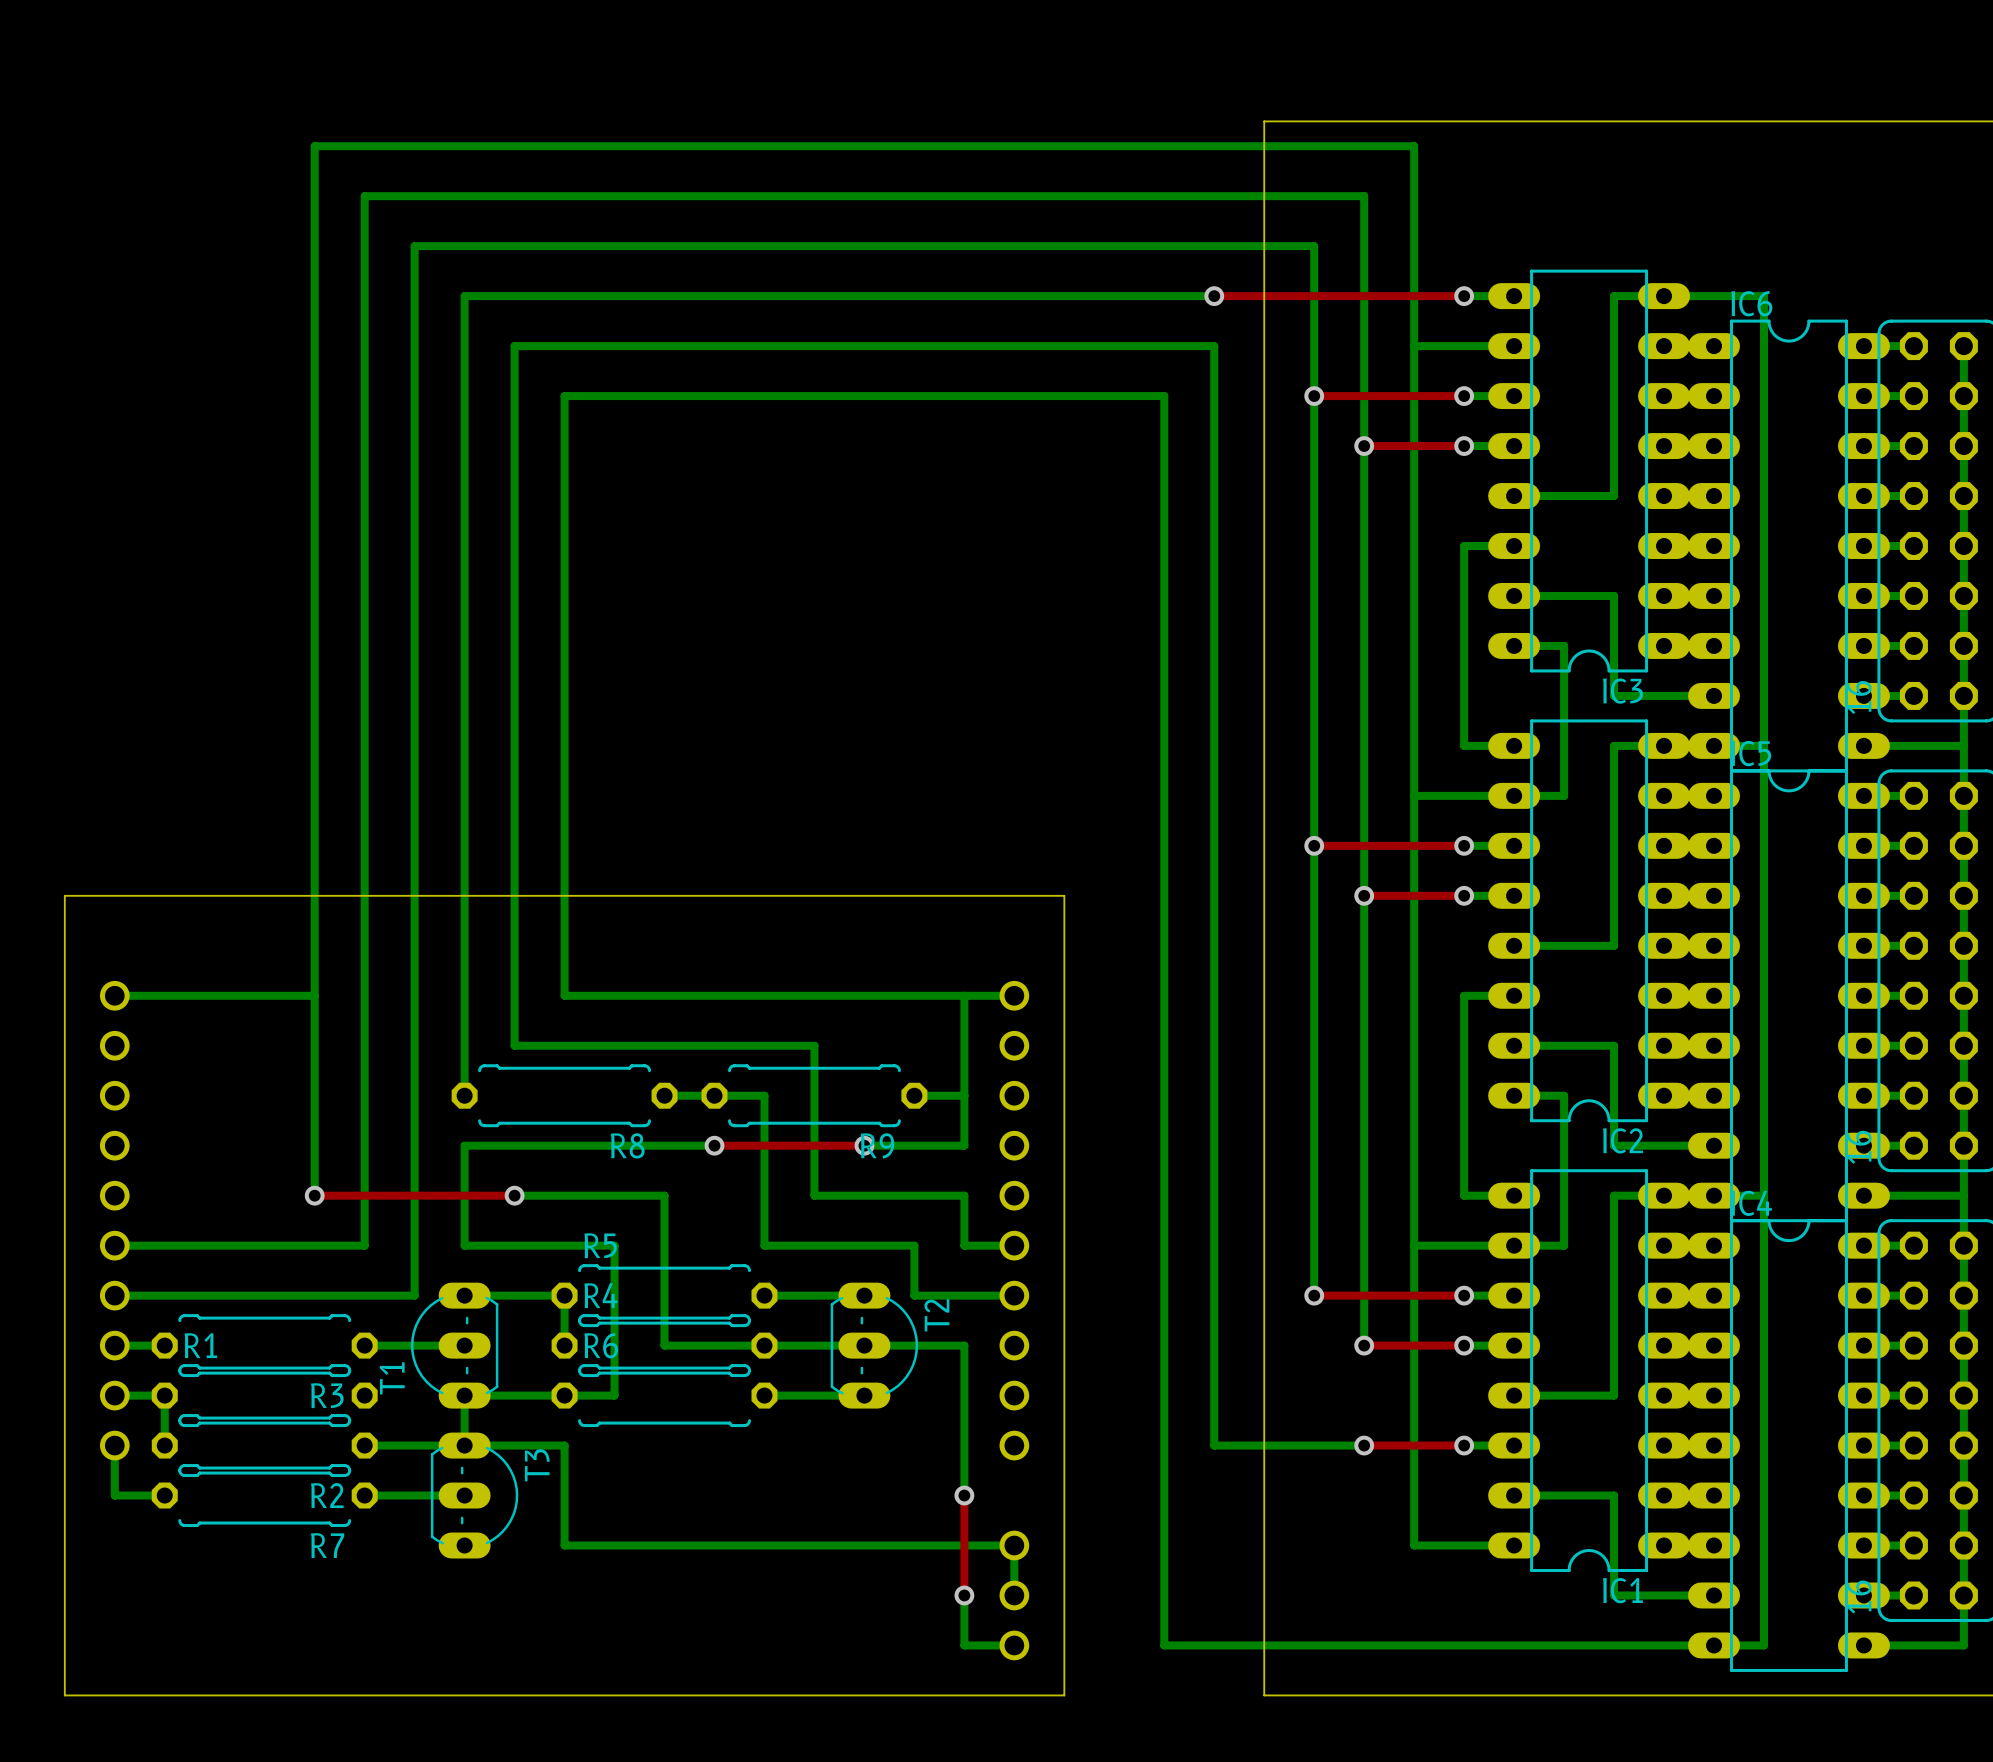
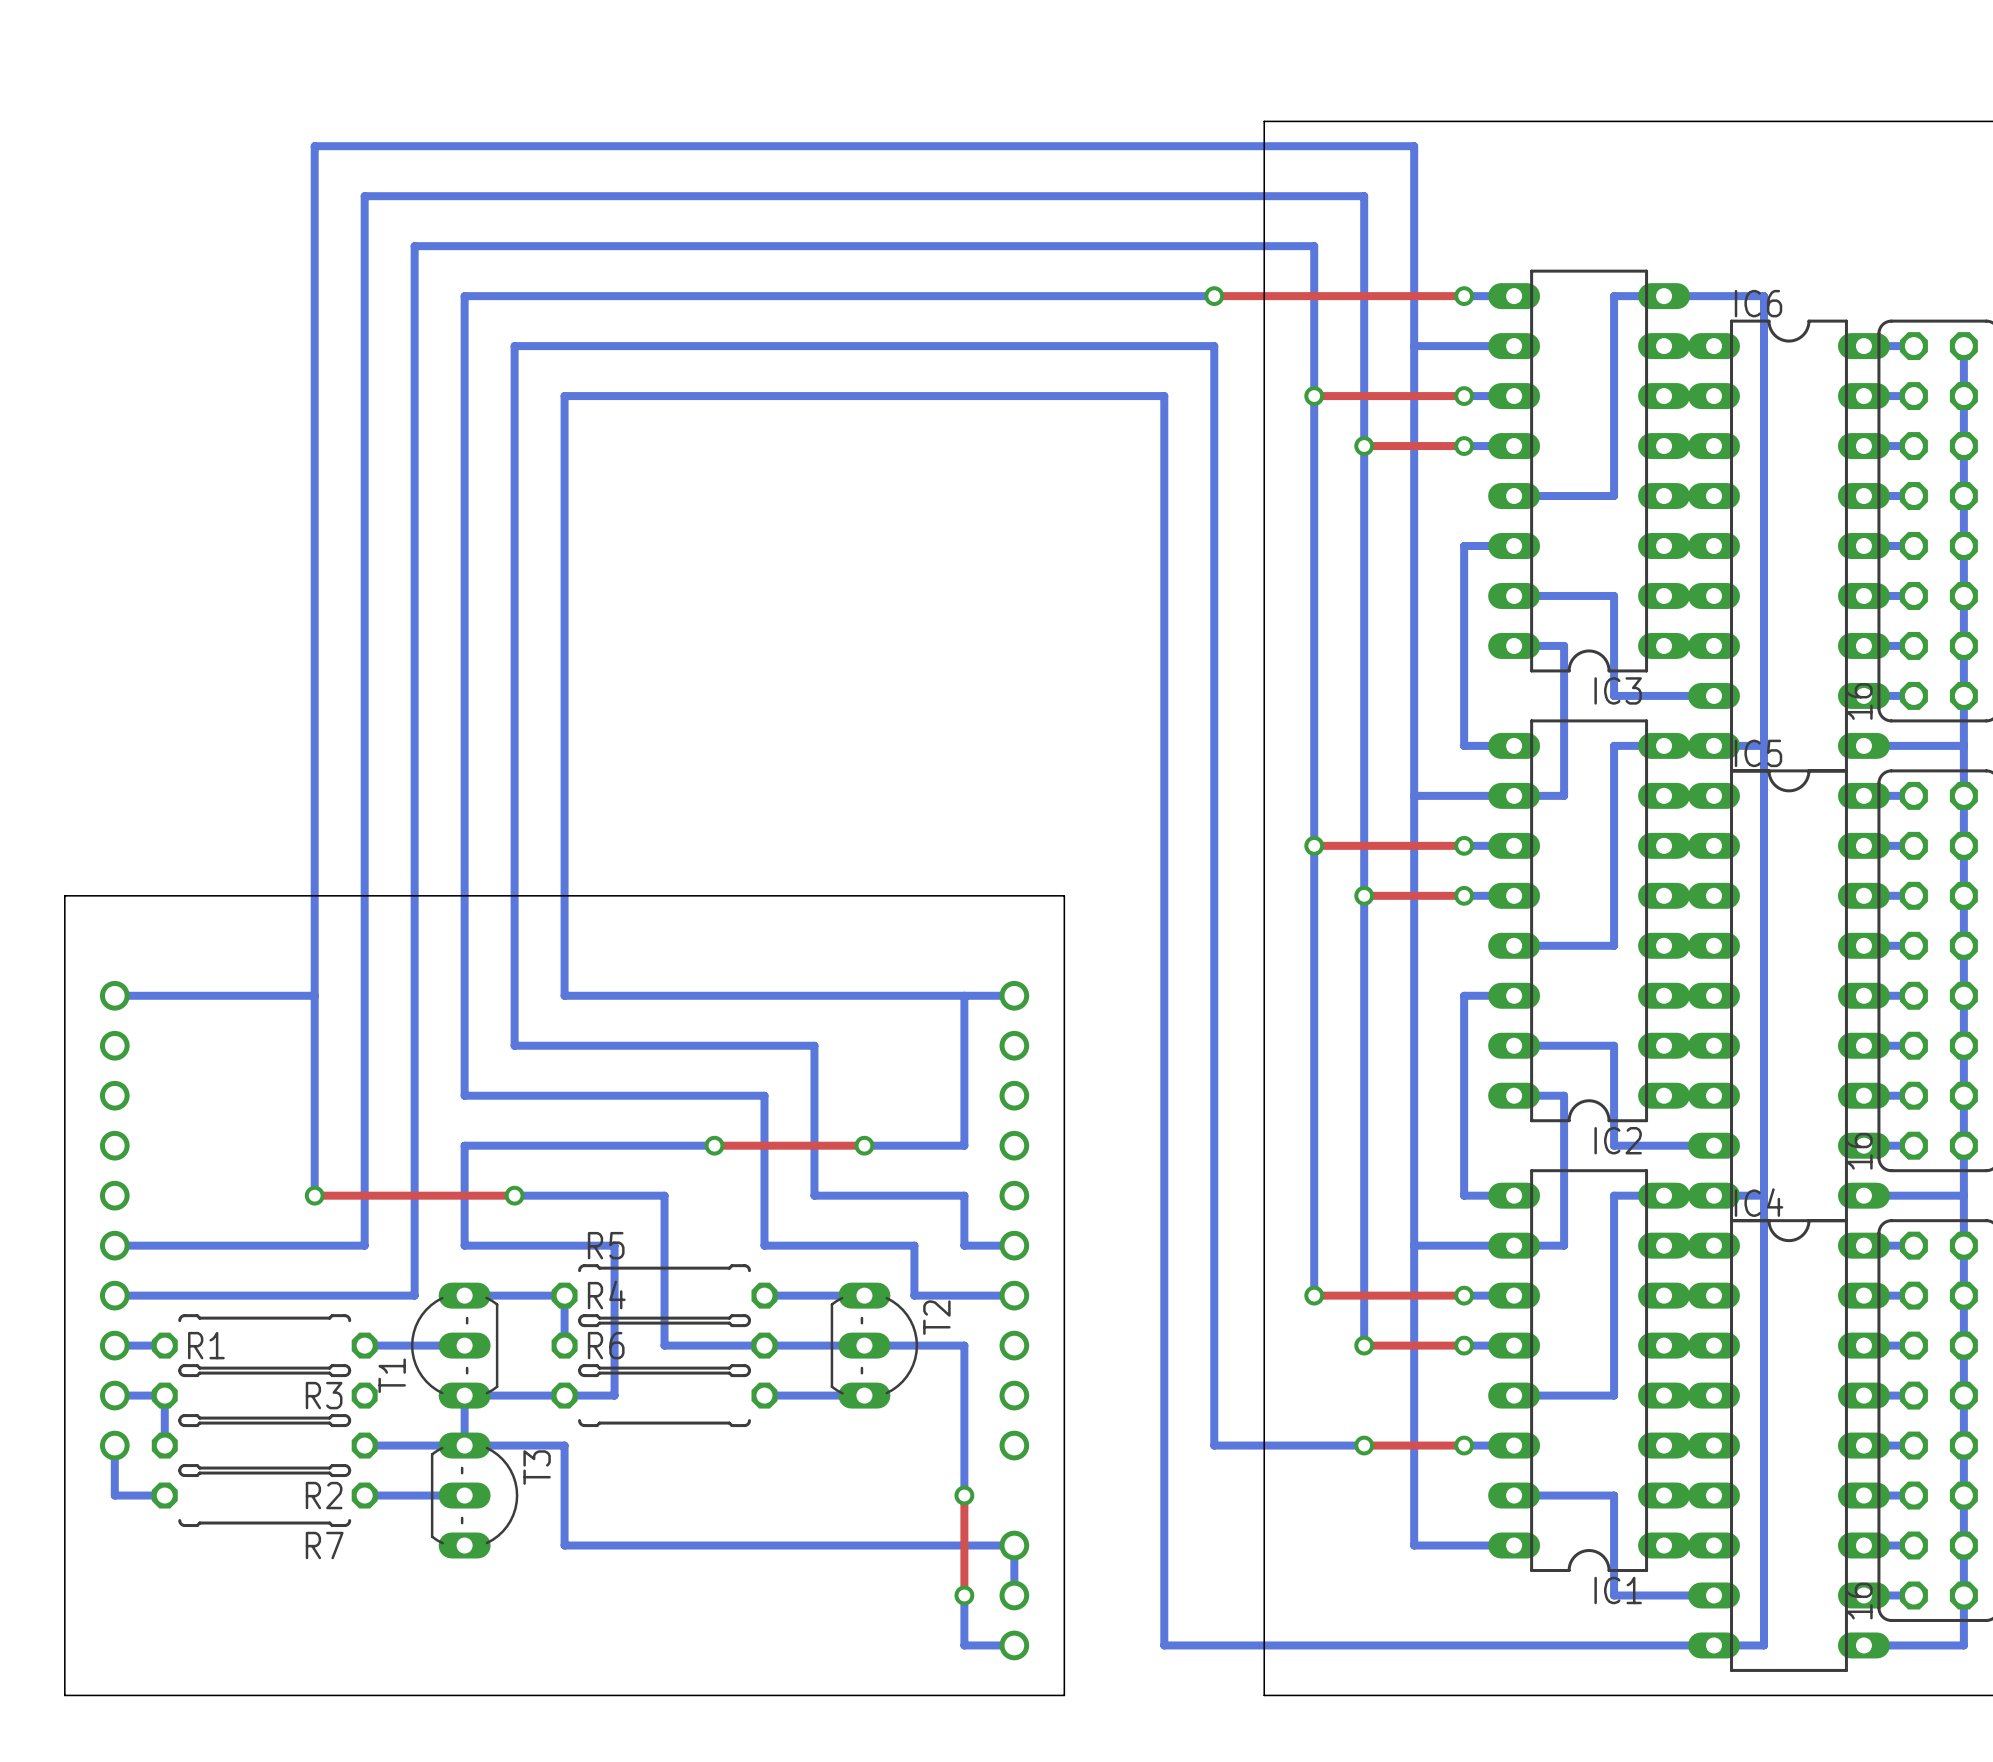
bottom track: none -> (464, 1095) (664, 1095)
R8: (564, 1095) -> none
R9: (814, 1095) -> none
bottom track: (914, 1095) (964, 1095) -> none

